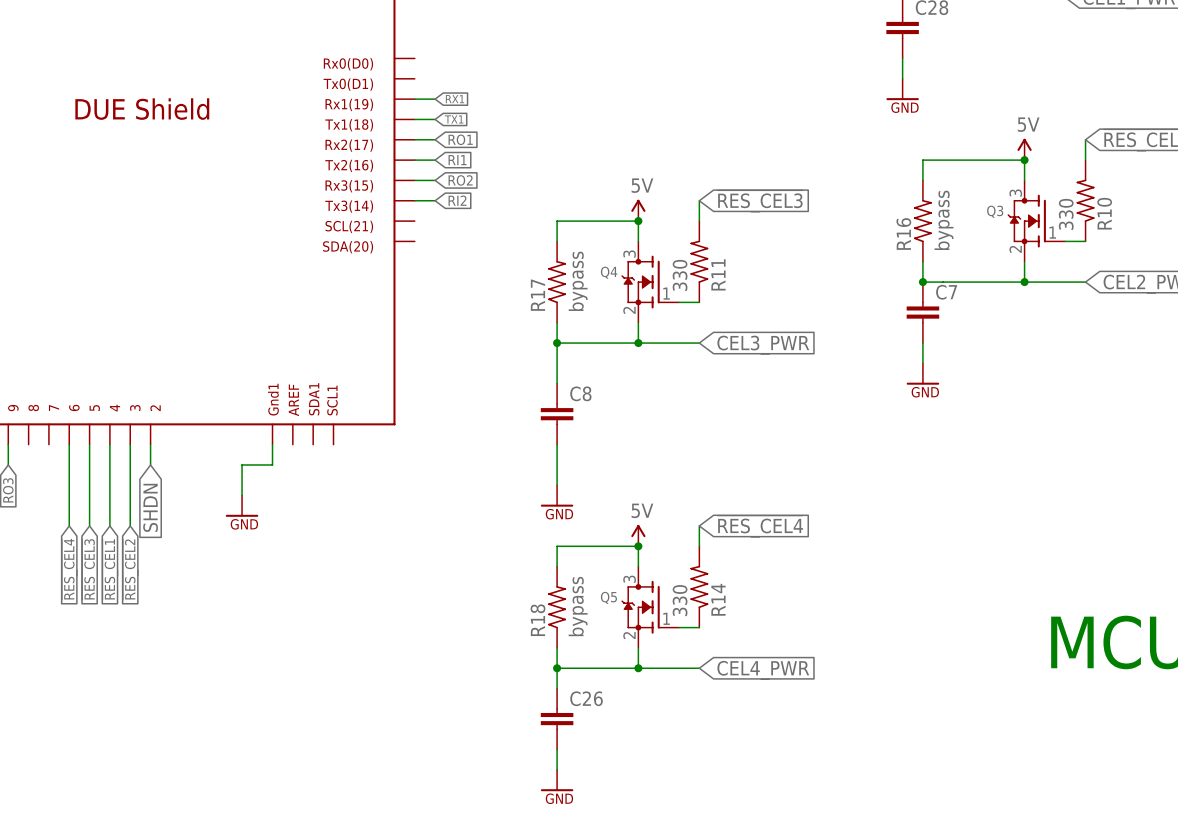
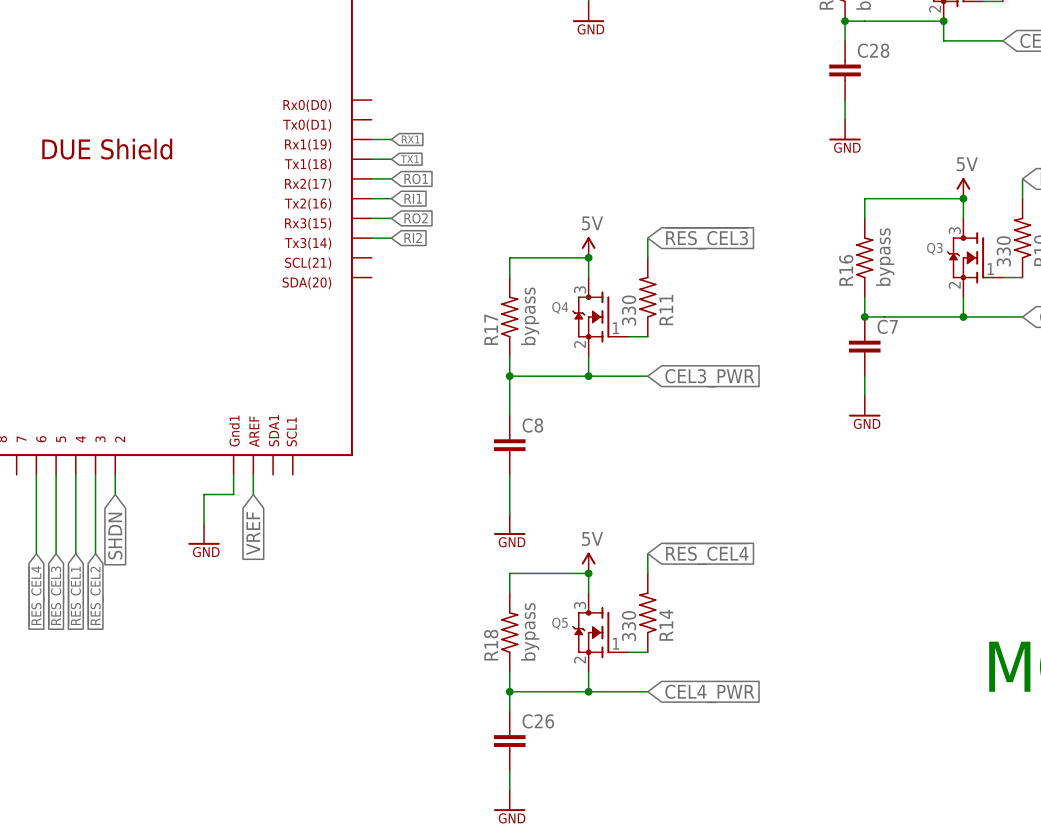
wire: none -> (253, 474) (253, 494)
global label: none -> VREF (253, 533)

